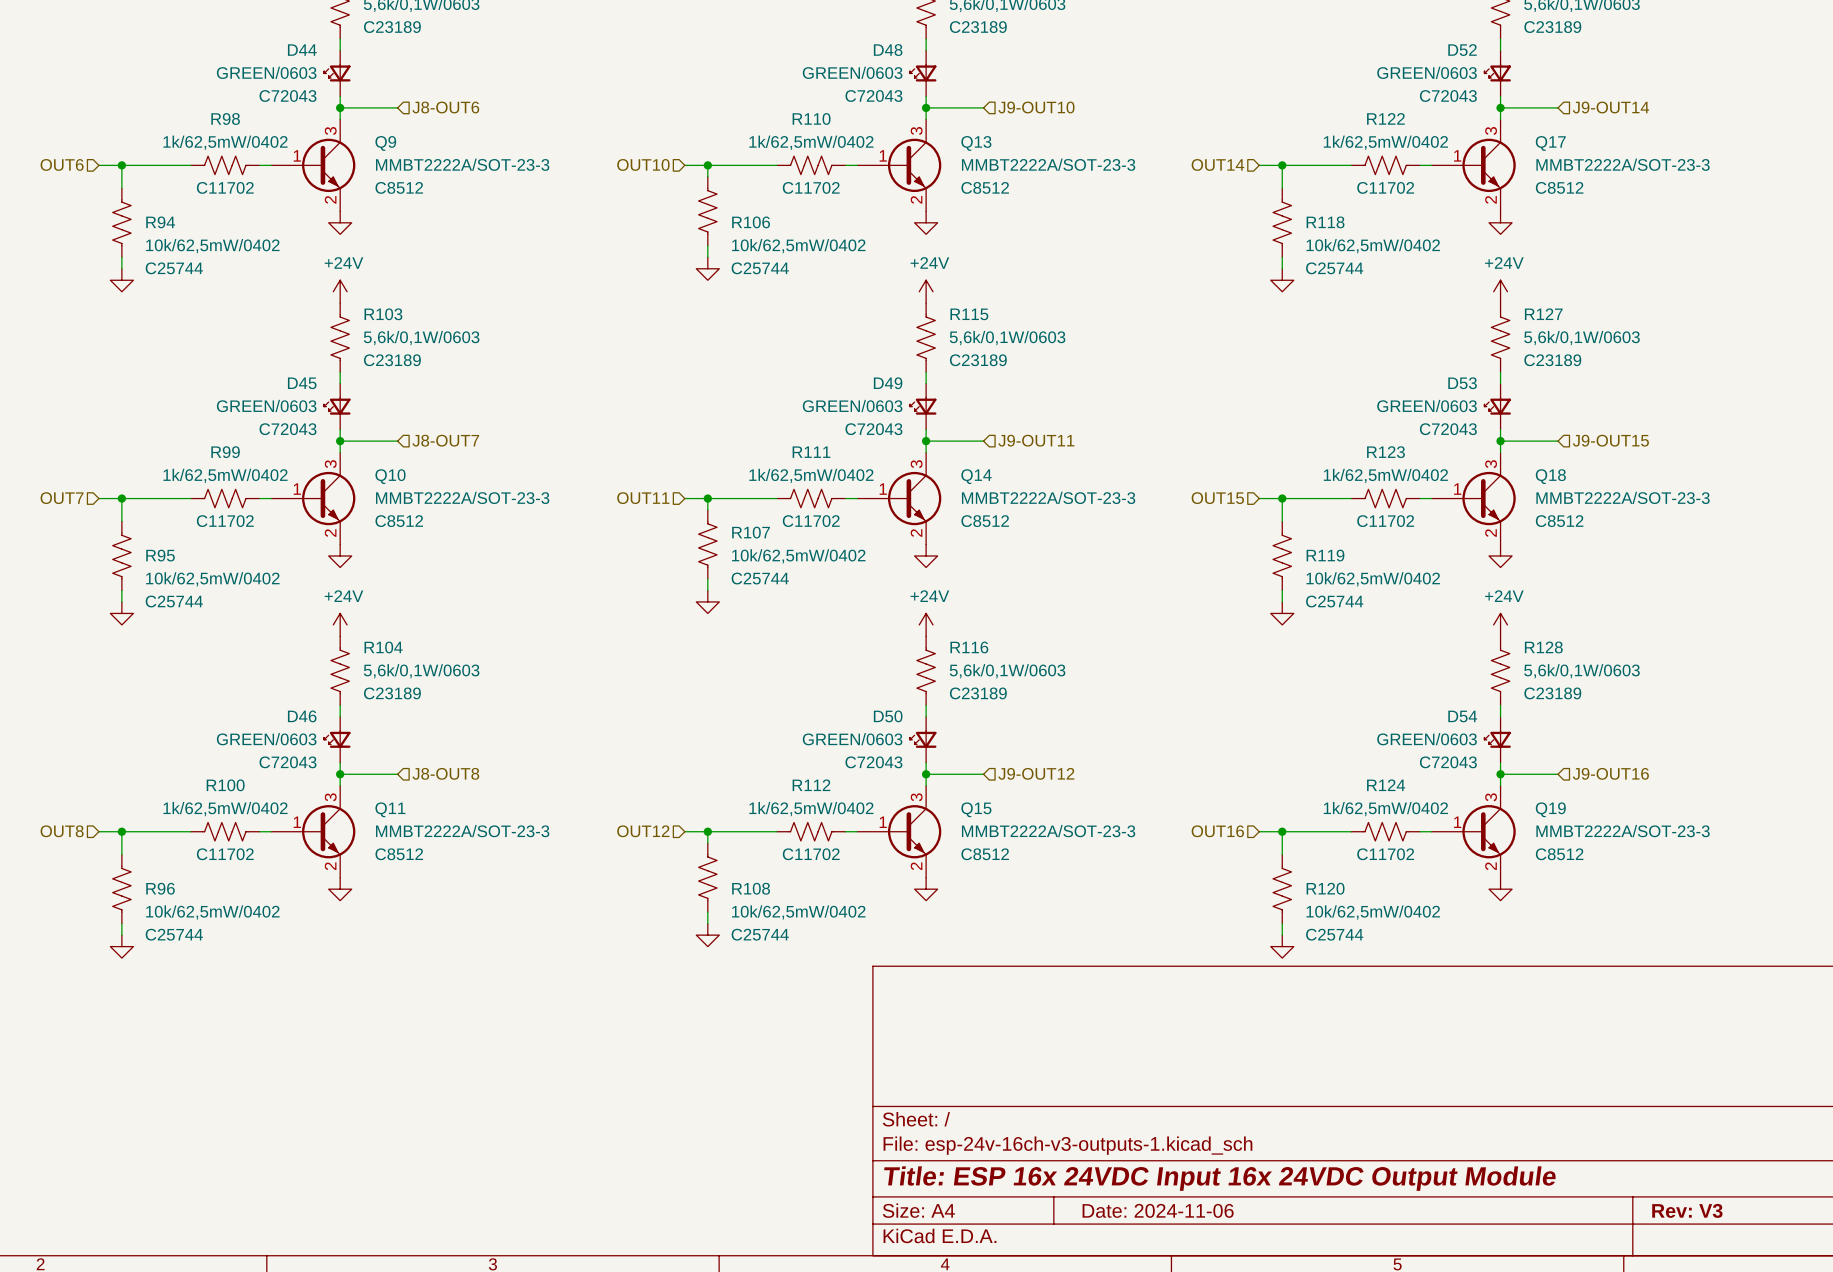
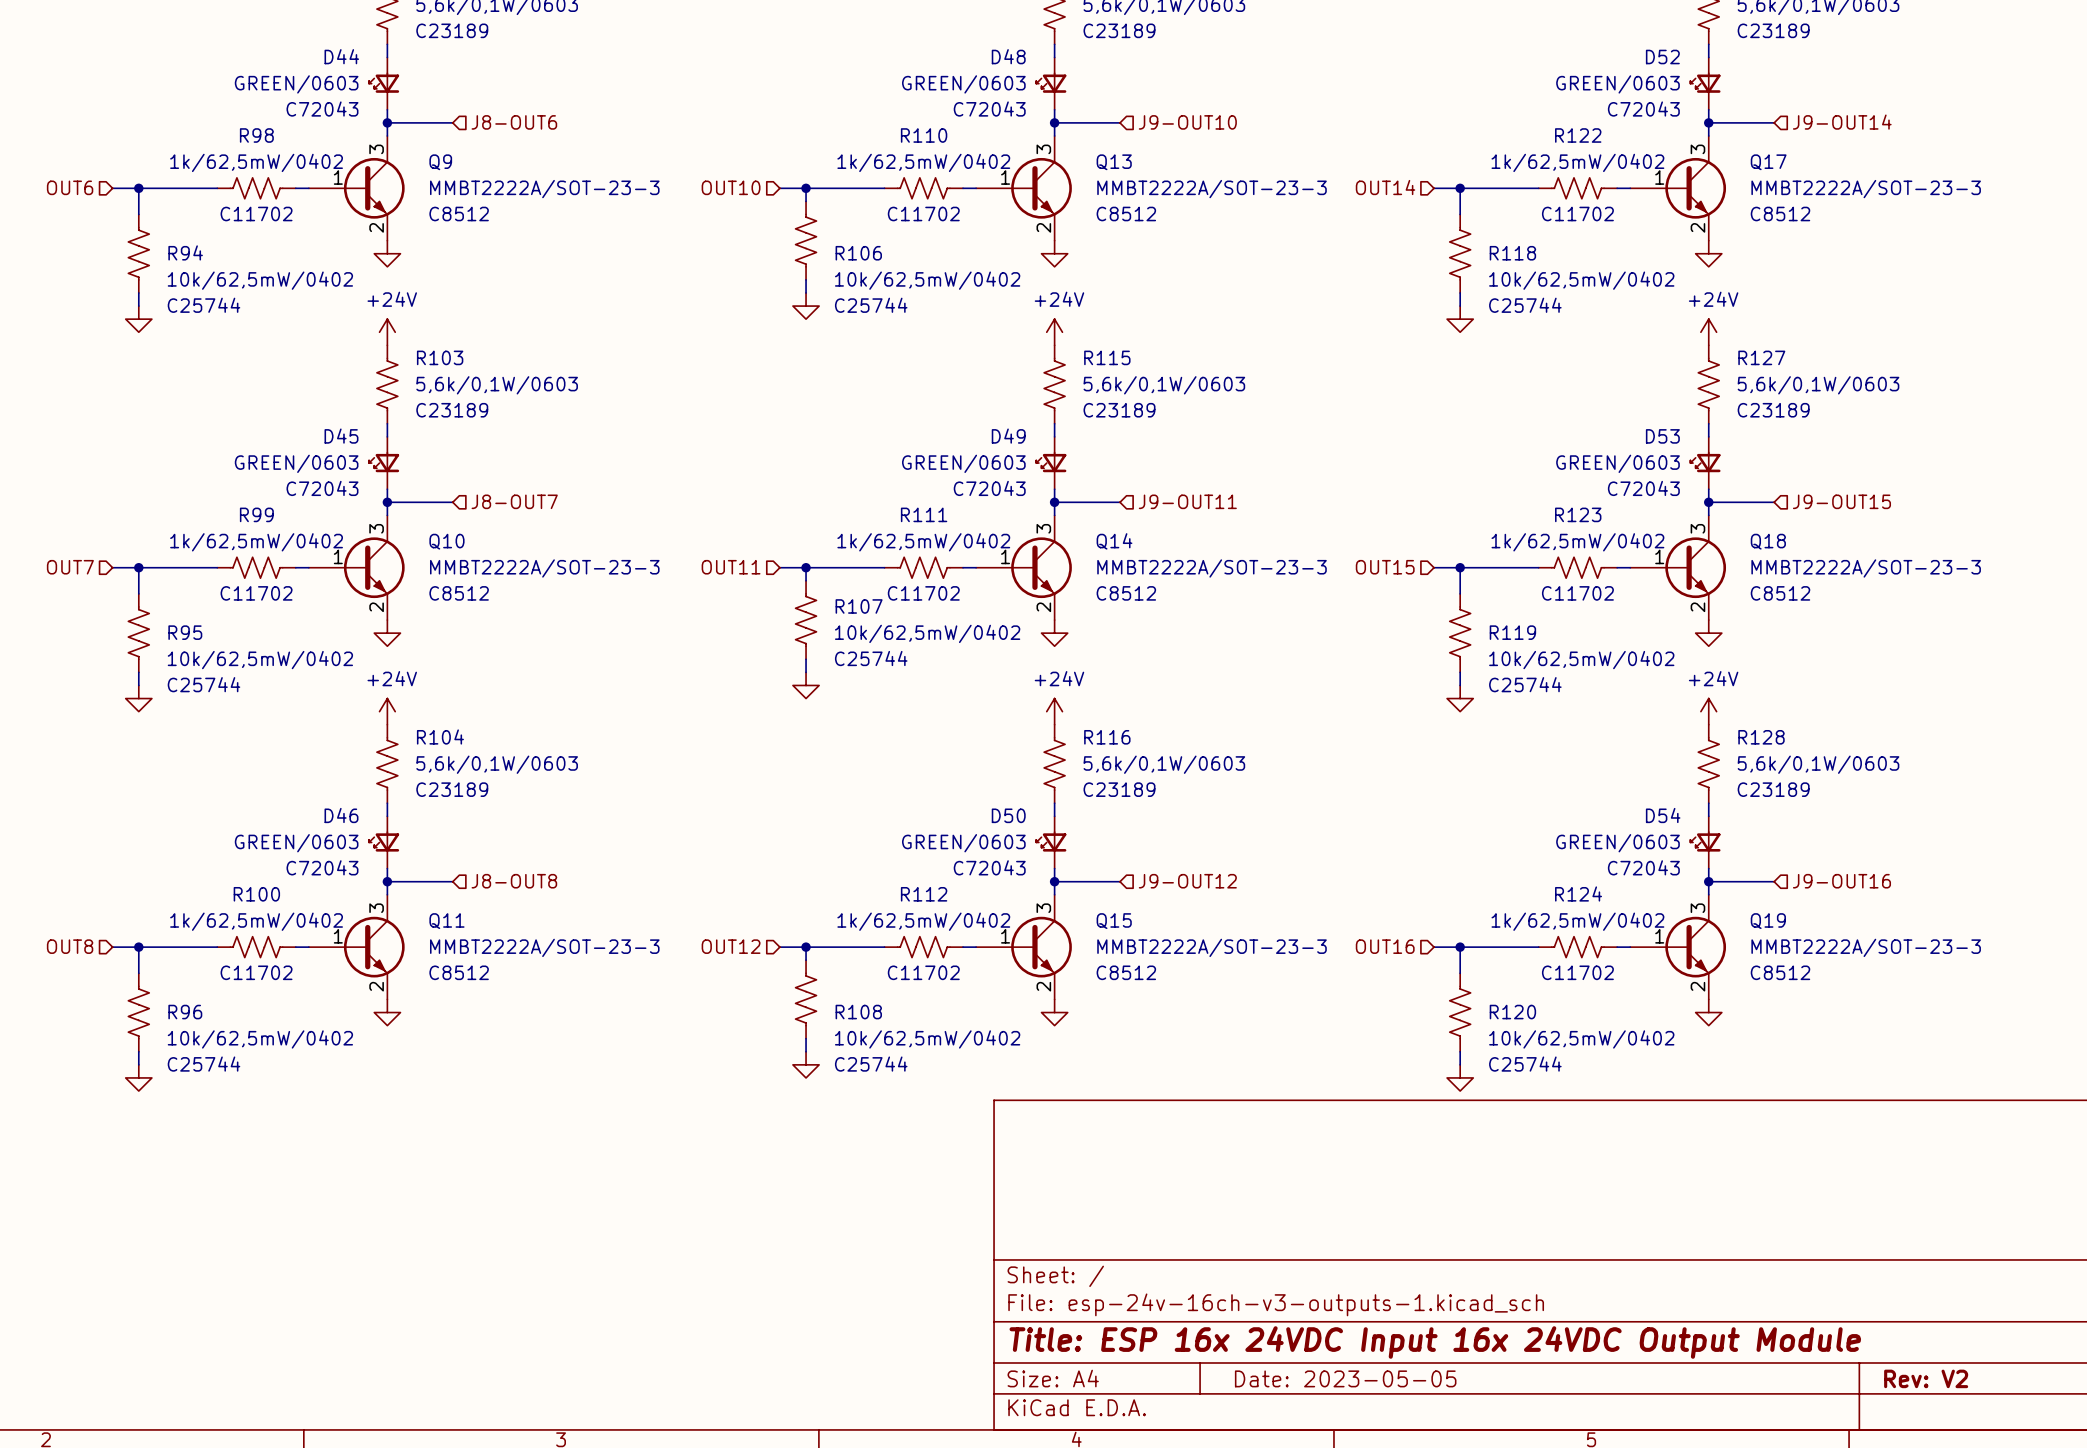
title block: Date: 2024-11-06 (1158, 1210) -> Date: 2023-05-05 (1345, 1378)
title block: Rev: V3 (1687, 1210) -> Rev: V2 (1926, 1378)

